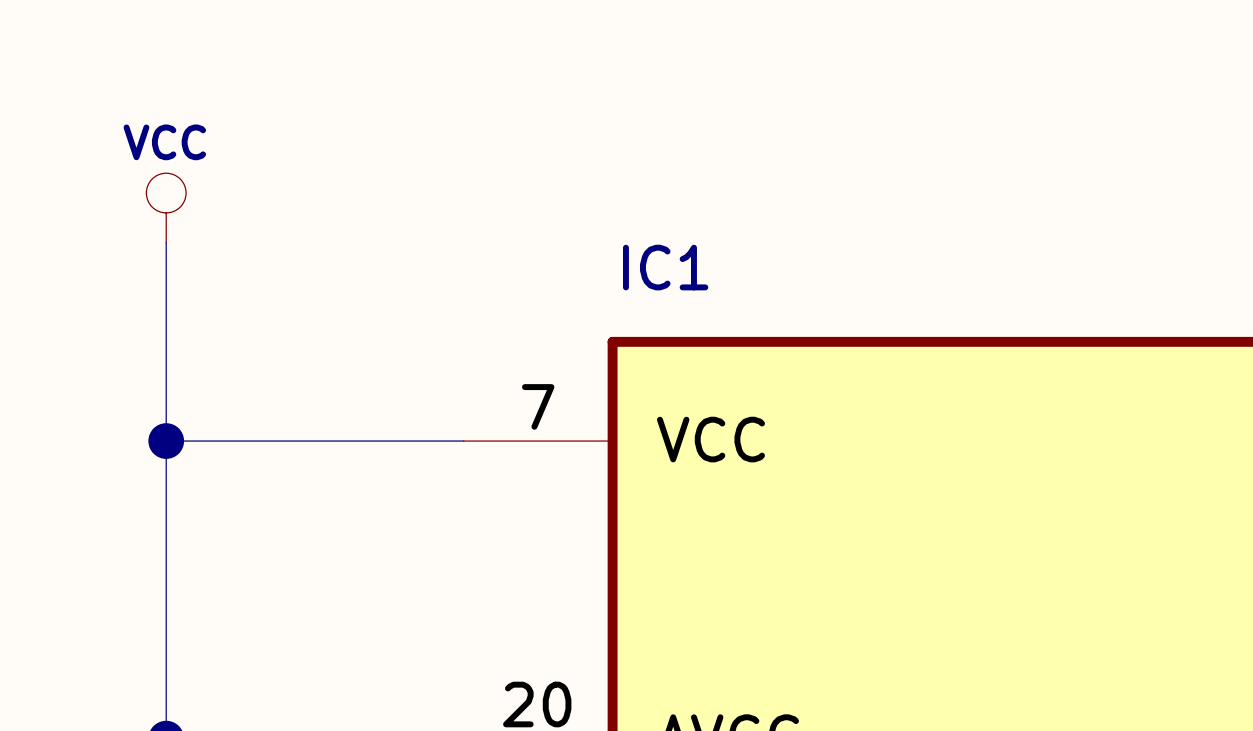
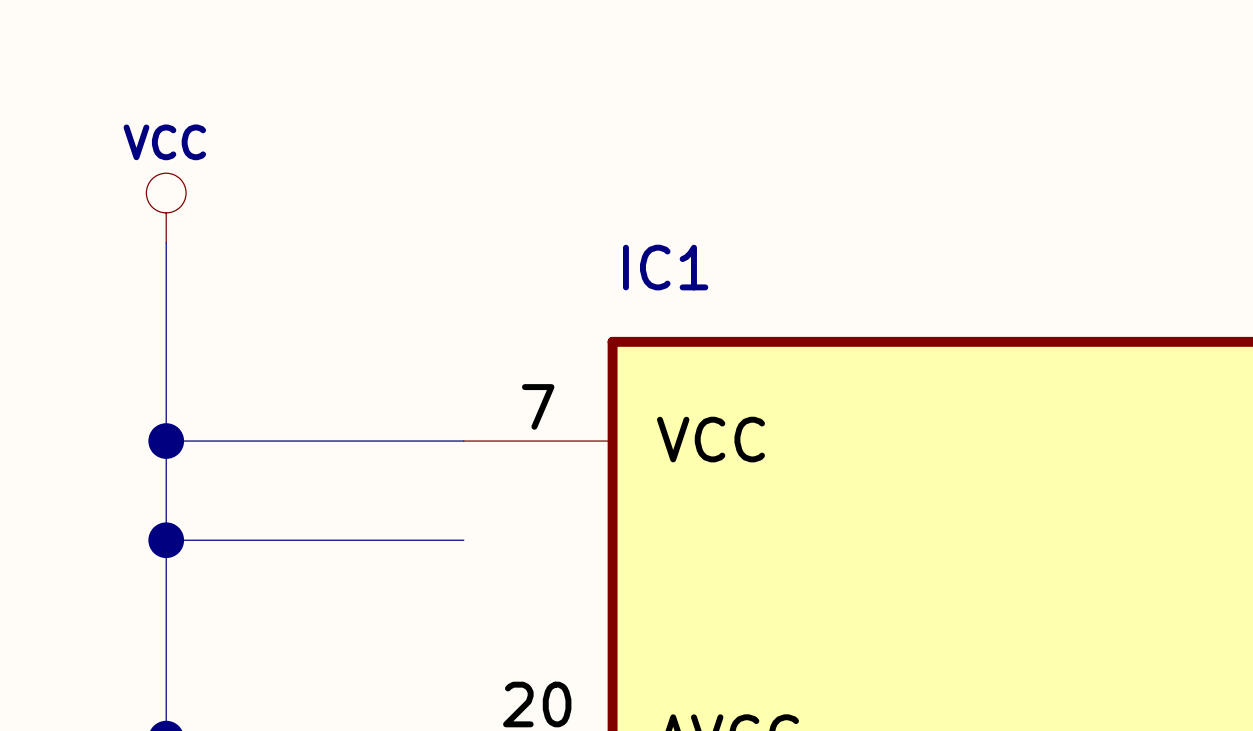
wire: none -> (166, 540) (463, 540)
junction: none -> (166, 540)

